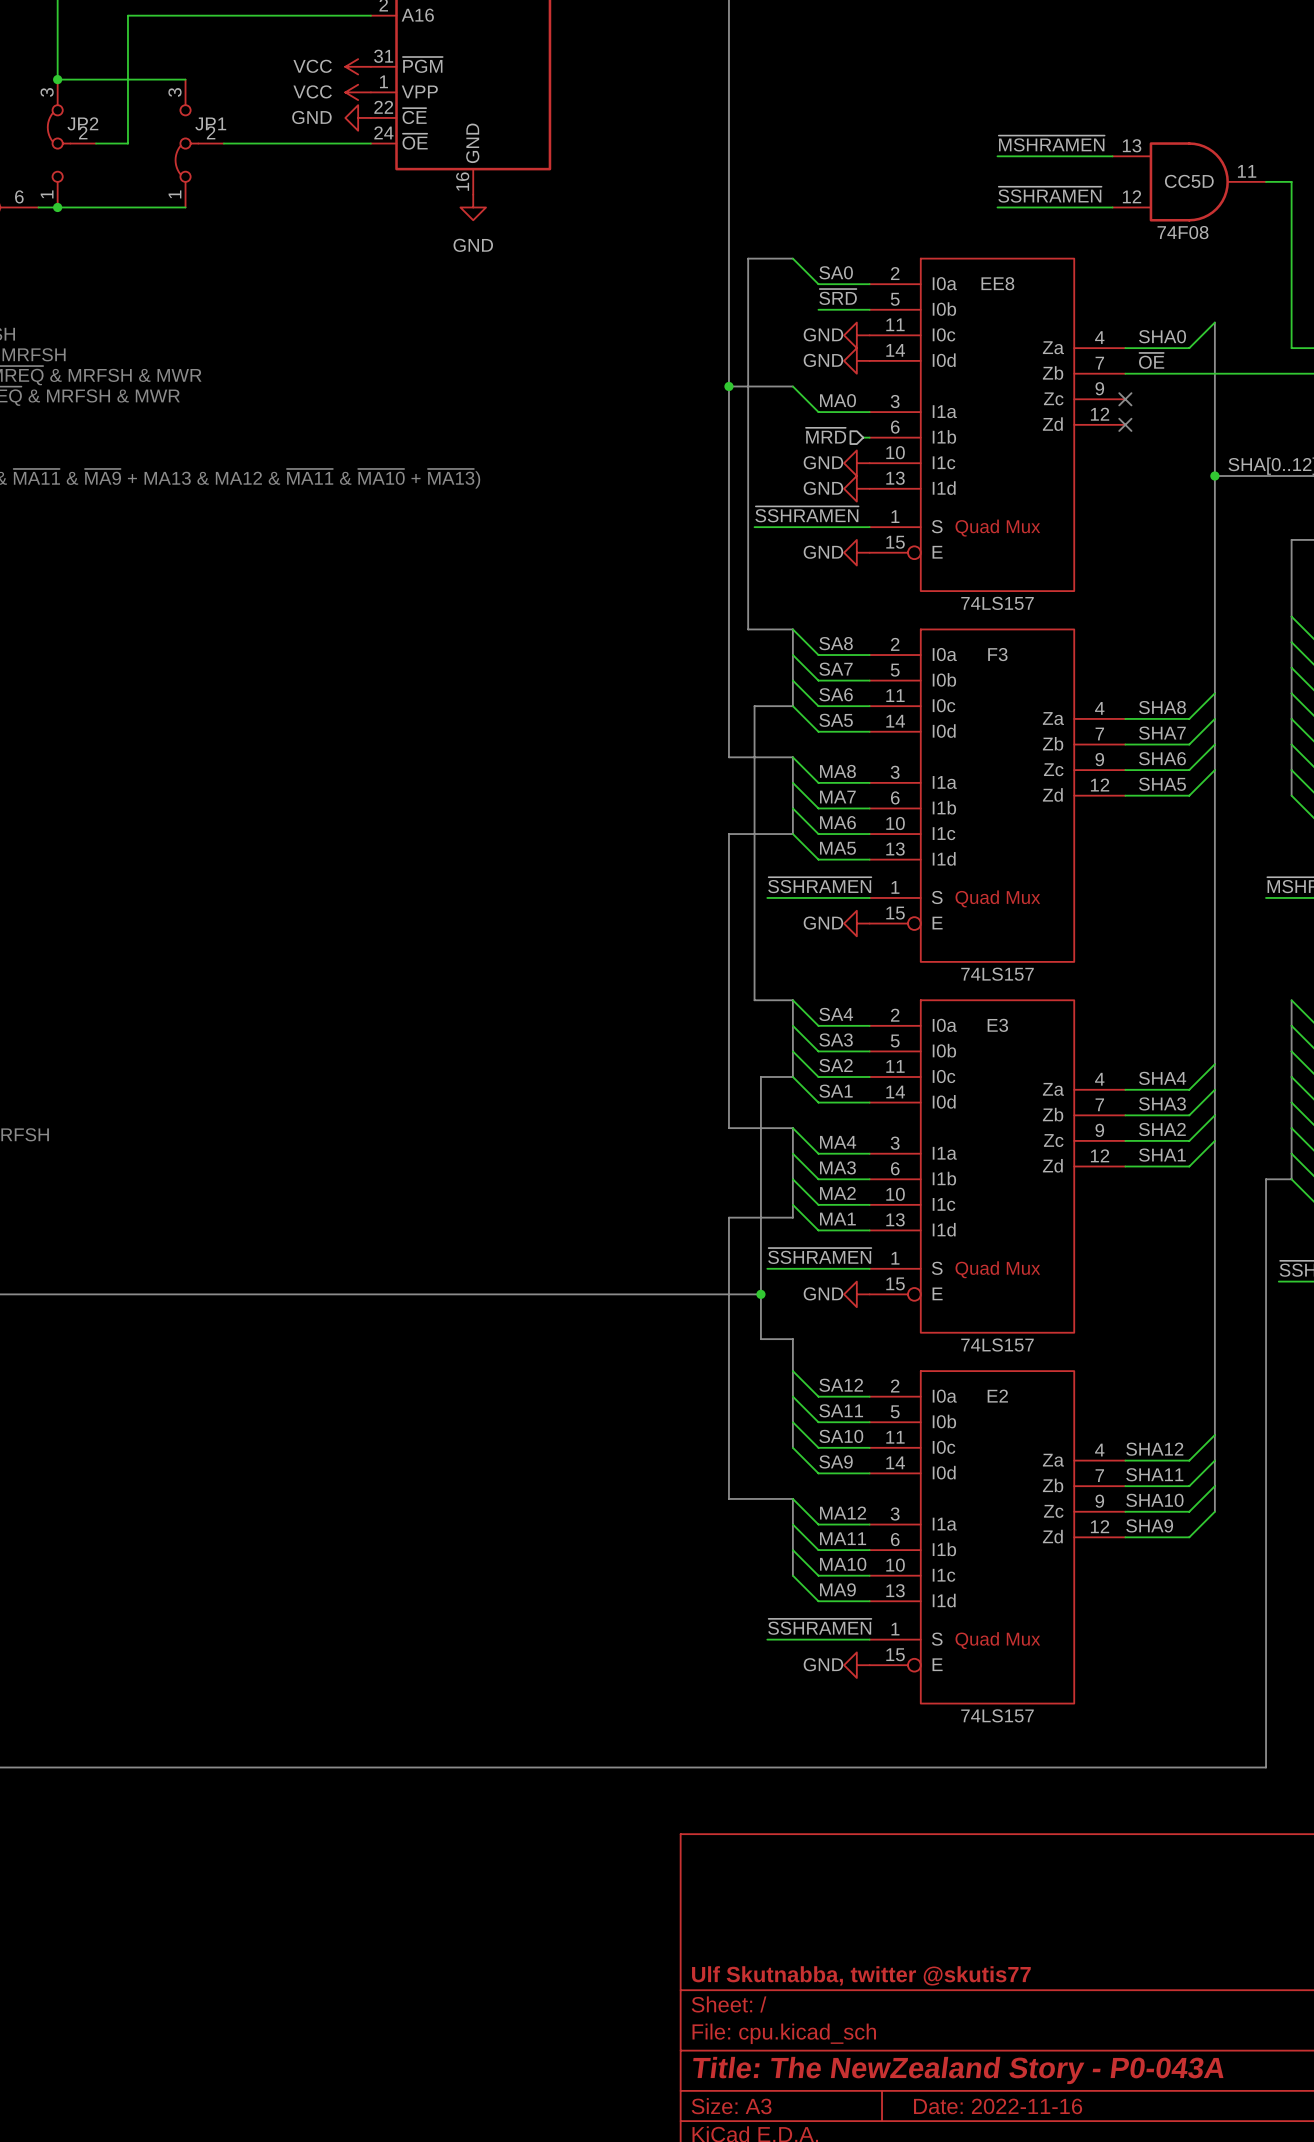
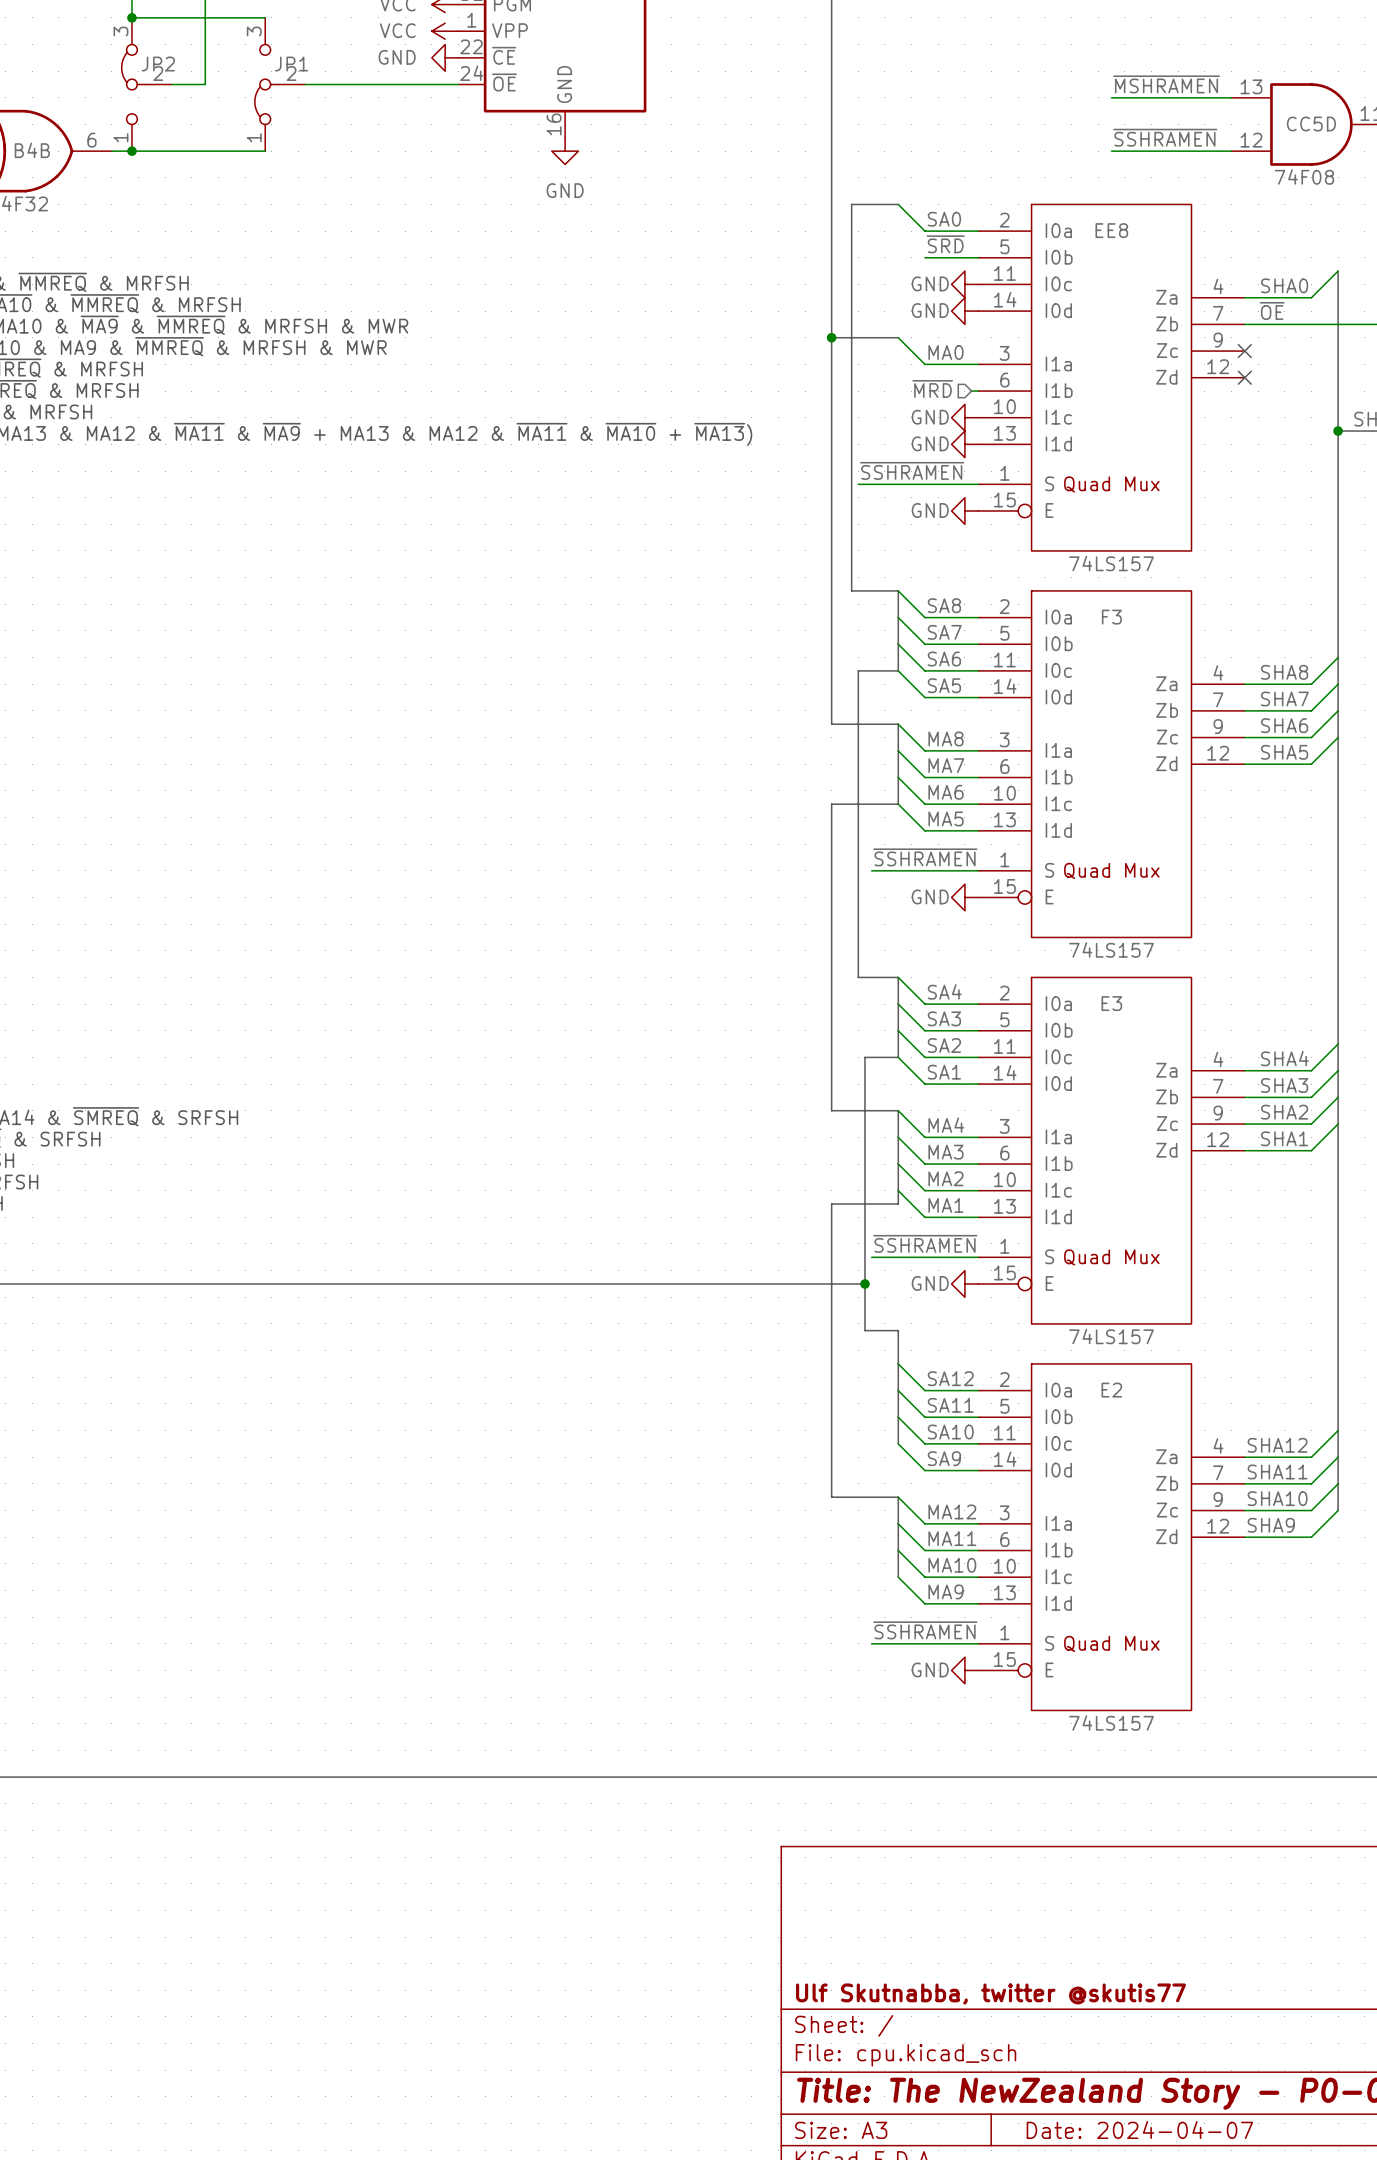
title block: Date: 2022-11-16 (998, 2106) -> Date: 2024-04-07 (1139, 2129)

